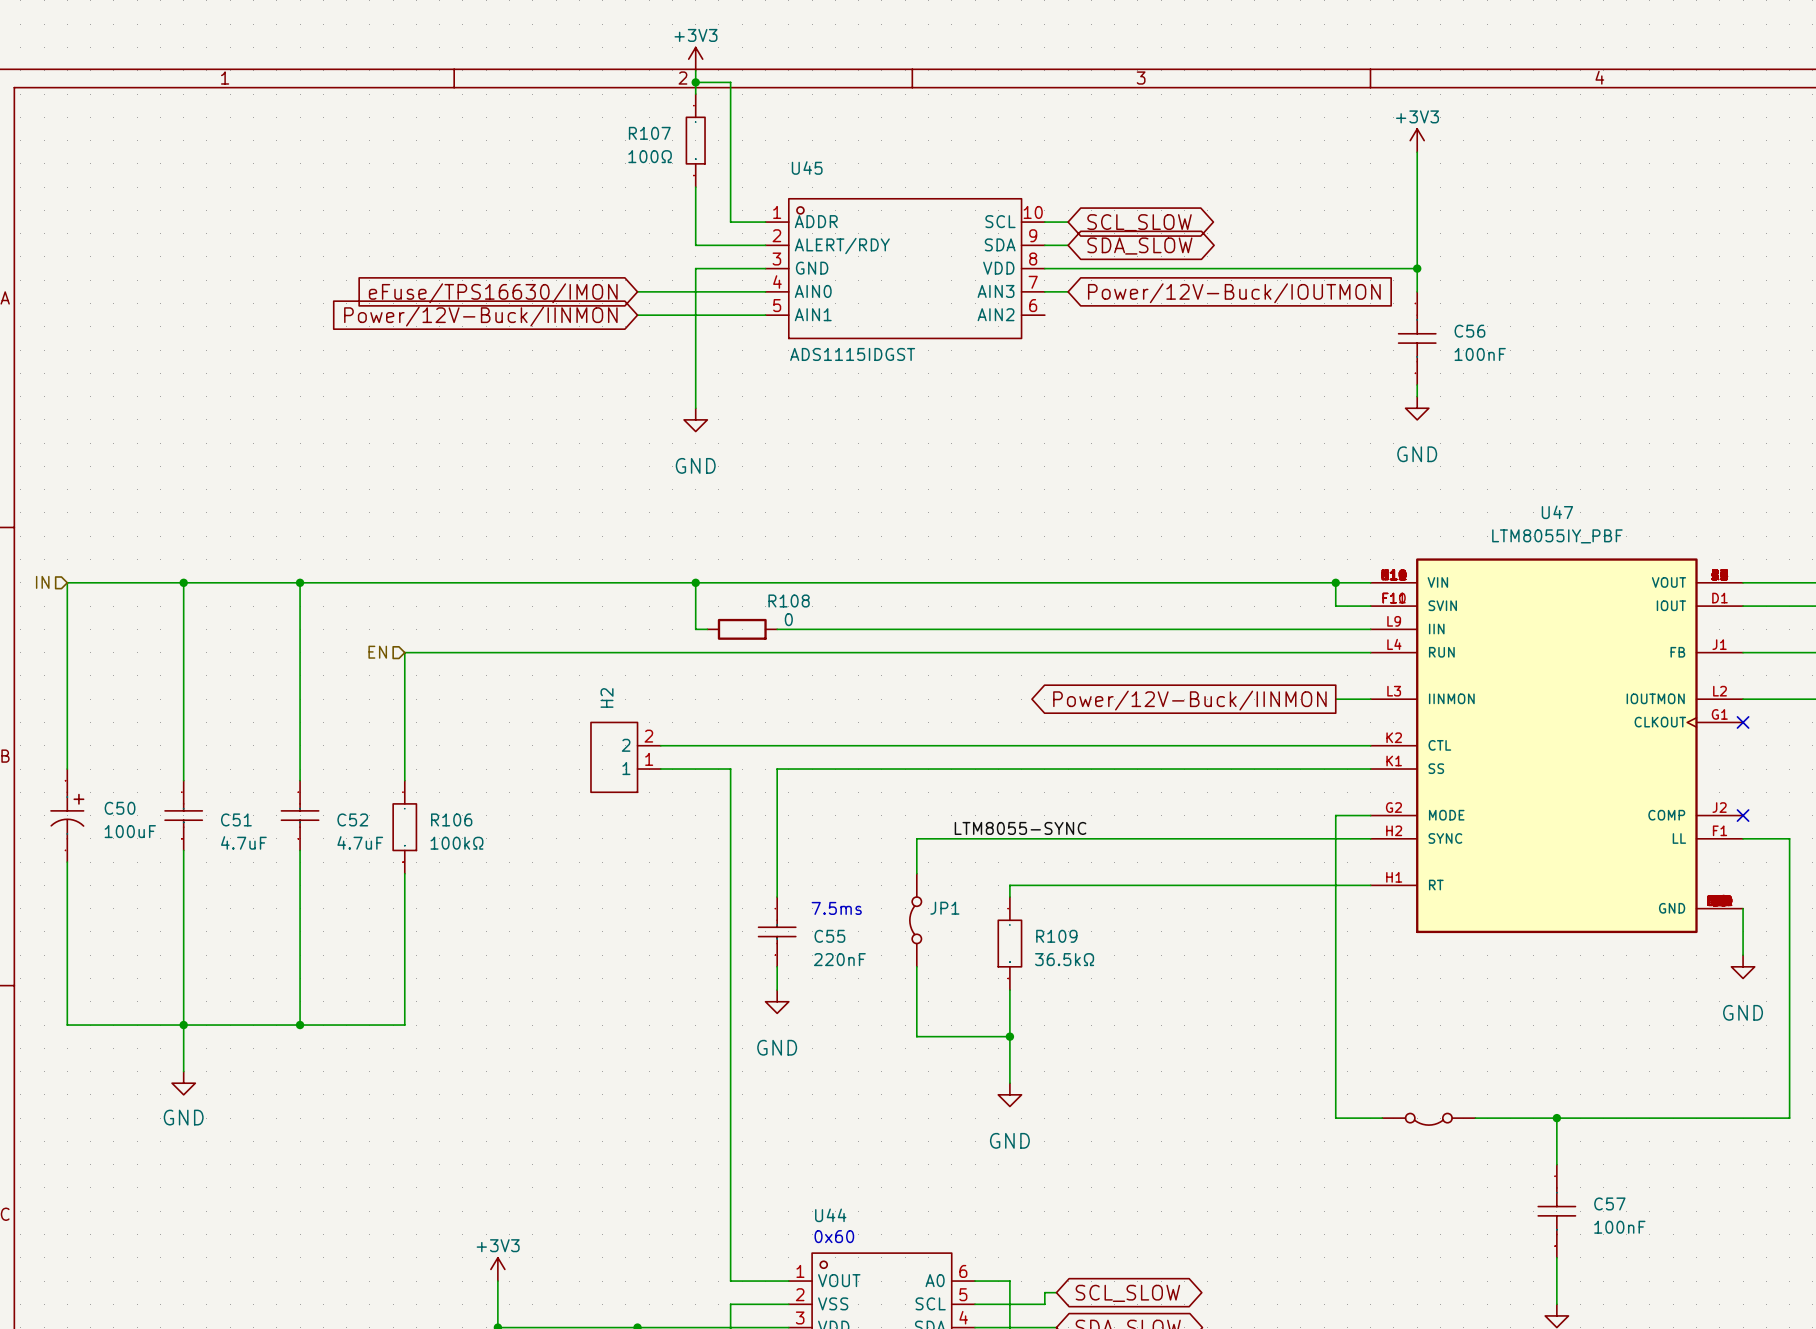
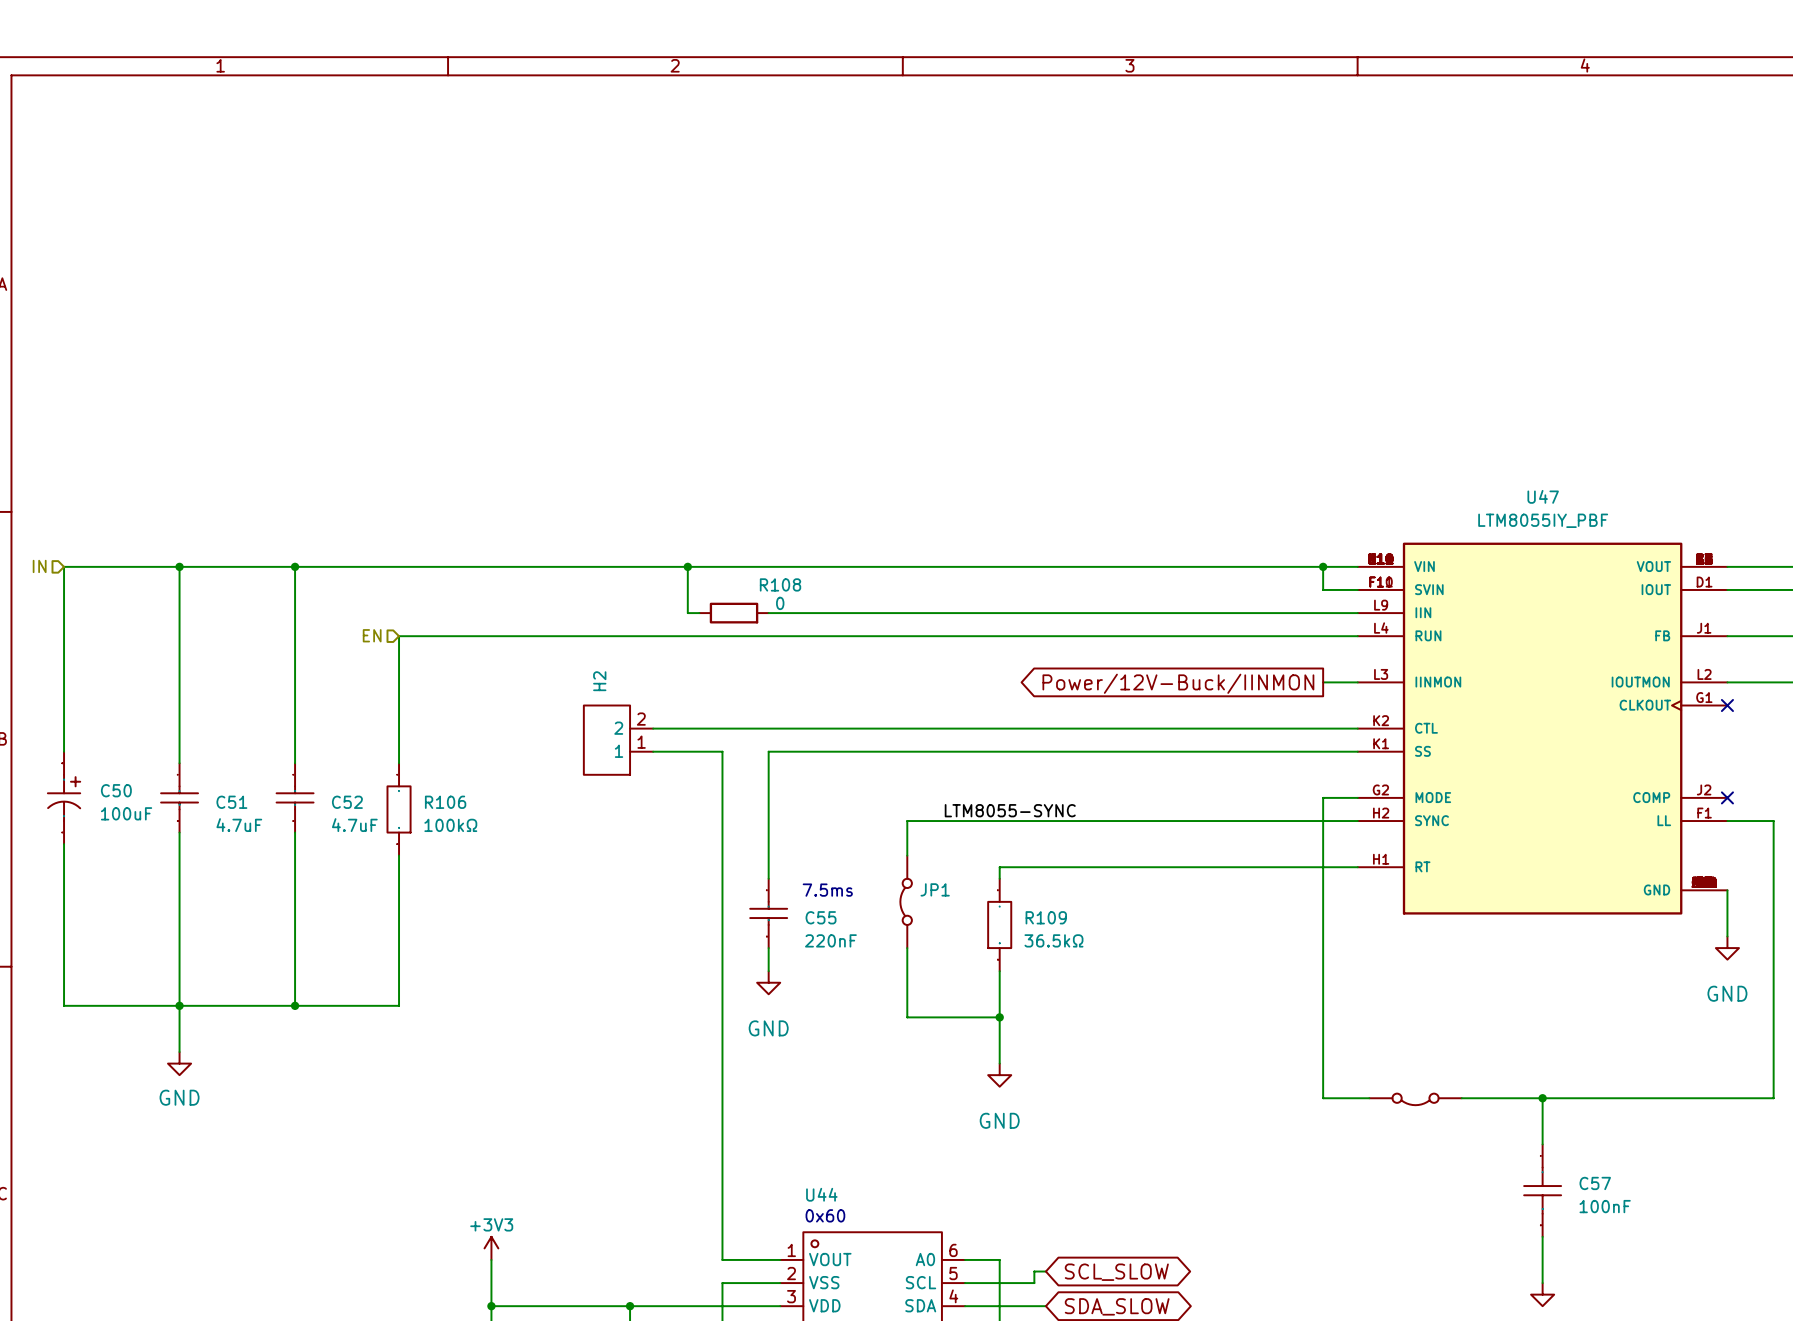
power symbol: +3V3 (695, 59) -> none
wire: (695, 70) (695, 94) -> none
wire: (695, 82) (730, 82) (730, 222) (765, 222) -> none
junction: (695, 82) -> none
R107: 100Ω (695, 140) -> none
power symbol: +3V3 (1417, 140) -> none
wire: (1417, 152) (1417, 291) -> none
wire: (695, 187) (695, 245) (765, 245) -> none
wire: (1044, 222) (1068, 222) -> none
global label: SCL_SLOW (1139, 222) -> none
wire: (1044, 245) (1068, 245) -> none
global label: SDA_SLOW (1139, 246) -> none
wire: (765, 268) (695, 268) (695, 408) -> none
U45: ADS1115IDGST (905, 268) -> none
wire: (1044, 268) (1417, 268) -> none
junction: (1417, 268) -> none
wire: (637, 291) (765, 291) -> none
wire: (1044, 291) (1068, 291) -> none
global label: eFuse/TPS16630/IMON (493, 293) -> none
global label: Power/12V-Buck/IOUTMON (1234, 293) -> none
wire: (637, 315) (765, 315) -> none
global label: Power/12V-Buck/IINMON (480, 316) -> none
C56: 100nF (1417, 338) -> none
wire: (1417, 384) (1417, 396) -> none
power symbol: GND (1417, 408) -> none
power symbol: GND (695, 419) -> none

